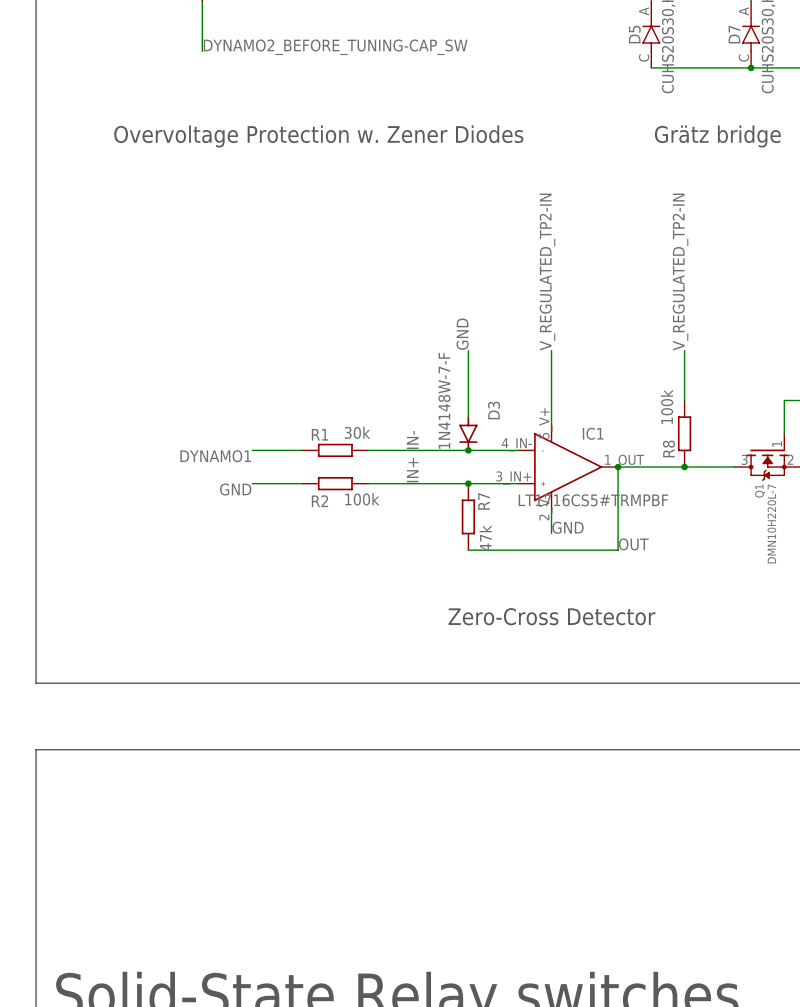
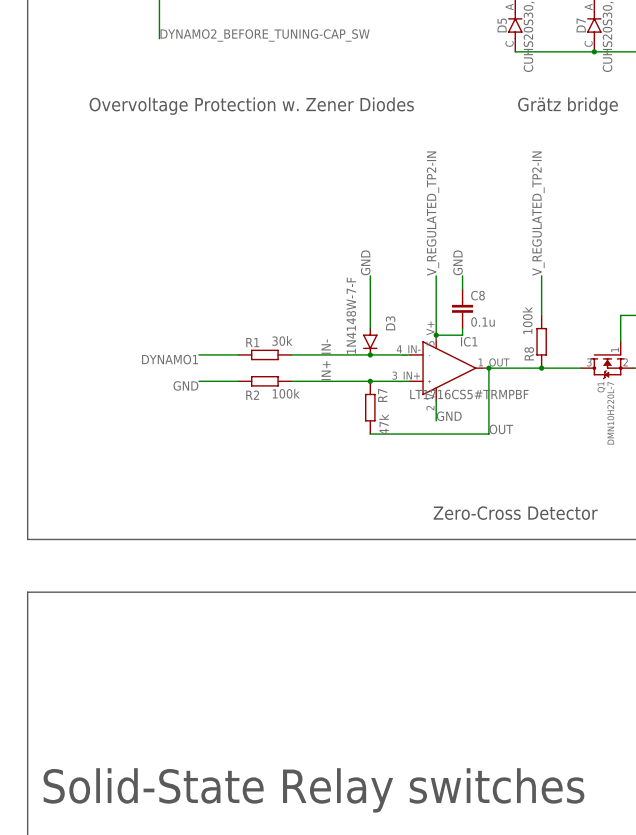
label: none -> GND (457, 262)
wire: none -> (462, 275) (462, 289)
C8: none -> 0.1u (462, 308)
wire: none -> (462, 328) (462, 335) (436, 335)
junction: none -> (436, 335)
text position: Zero-Cross Detector (551, 616) -> Zero-Cross Detector (515, 513)

